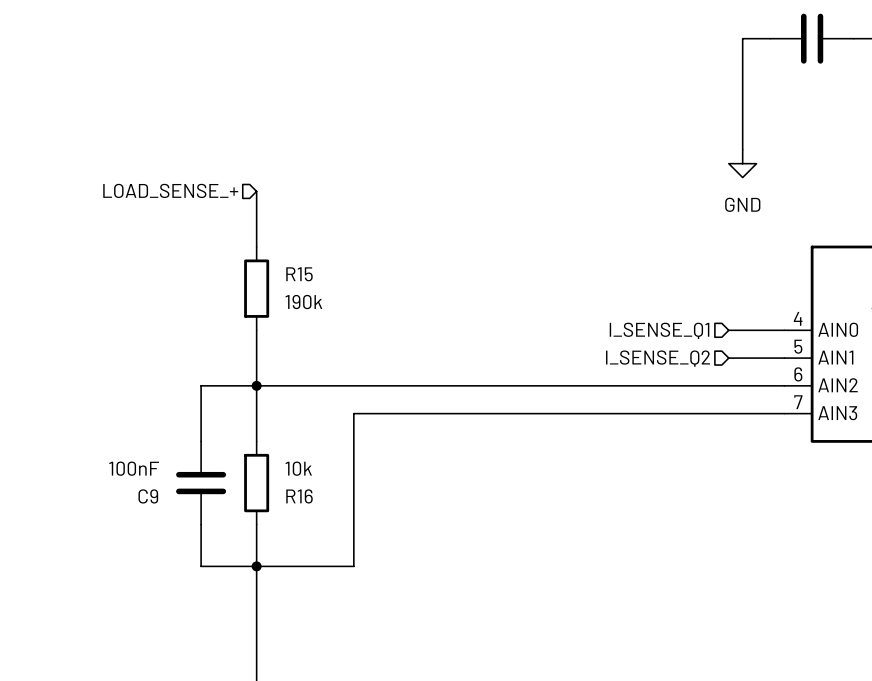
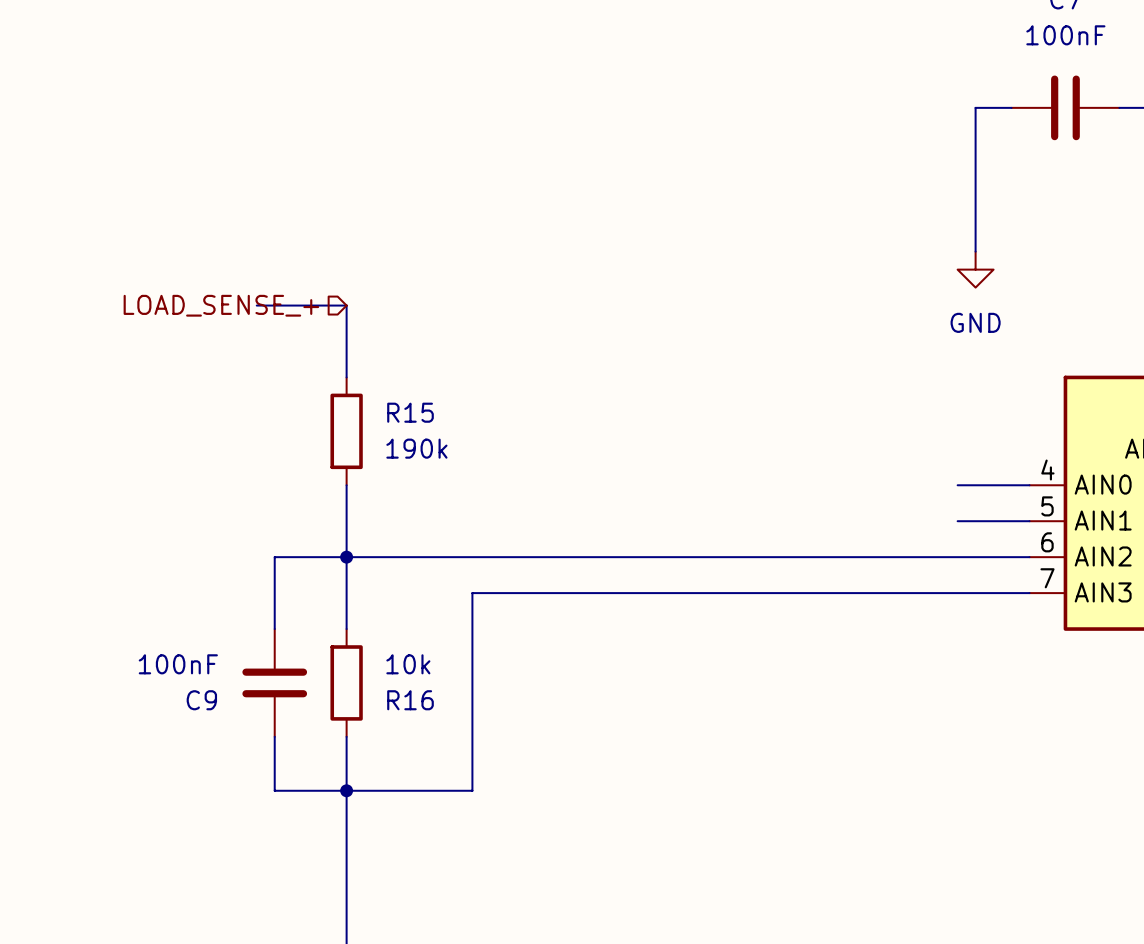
wire: none -> (256, 305) (346, 305)
hierarchical label: I_SENSE_Q1 (659, 330) -> none
hierarchical label: I_SENSE_Q2 (658, 358) -> none

